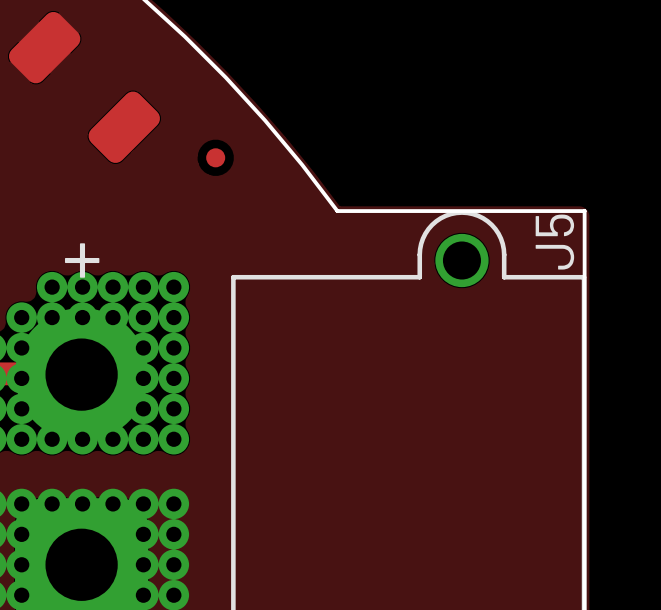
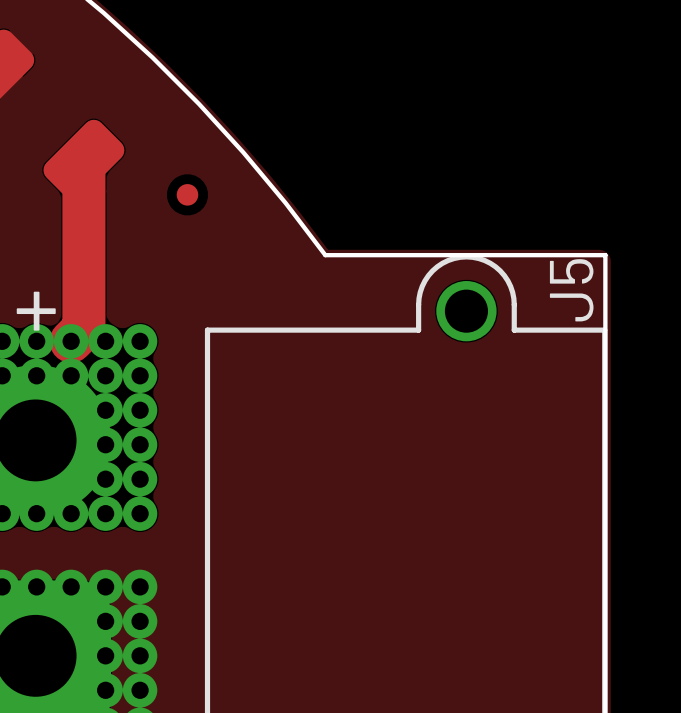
track: none -> (83, 160) (83, 328) (71, 341)

